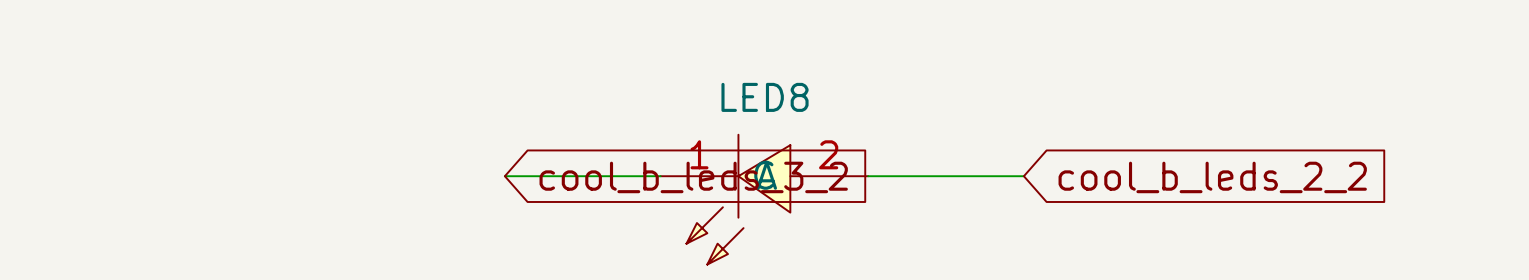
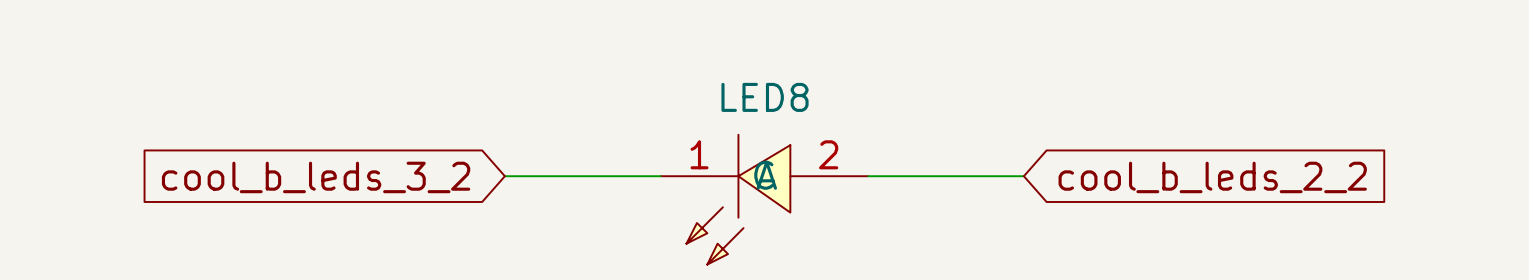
global label rotation: 0° (693, 177) -> 180° (316, 177)
global label position: cool_b_leds_3_2 (693, 177) -> cool_b_leds_3_2 (316, 177)

